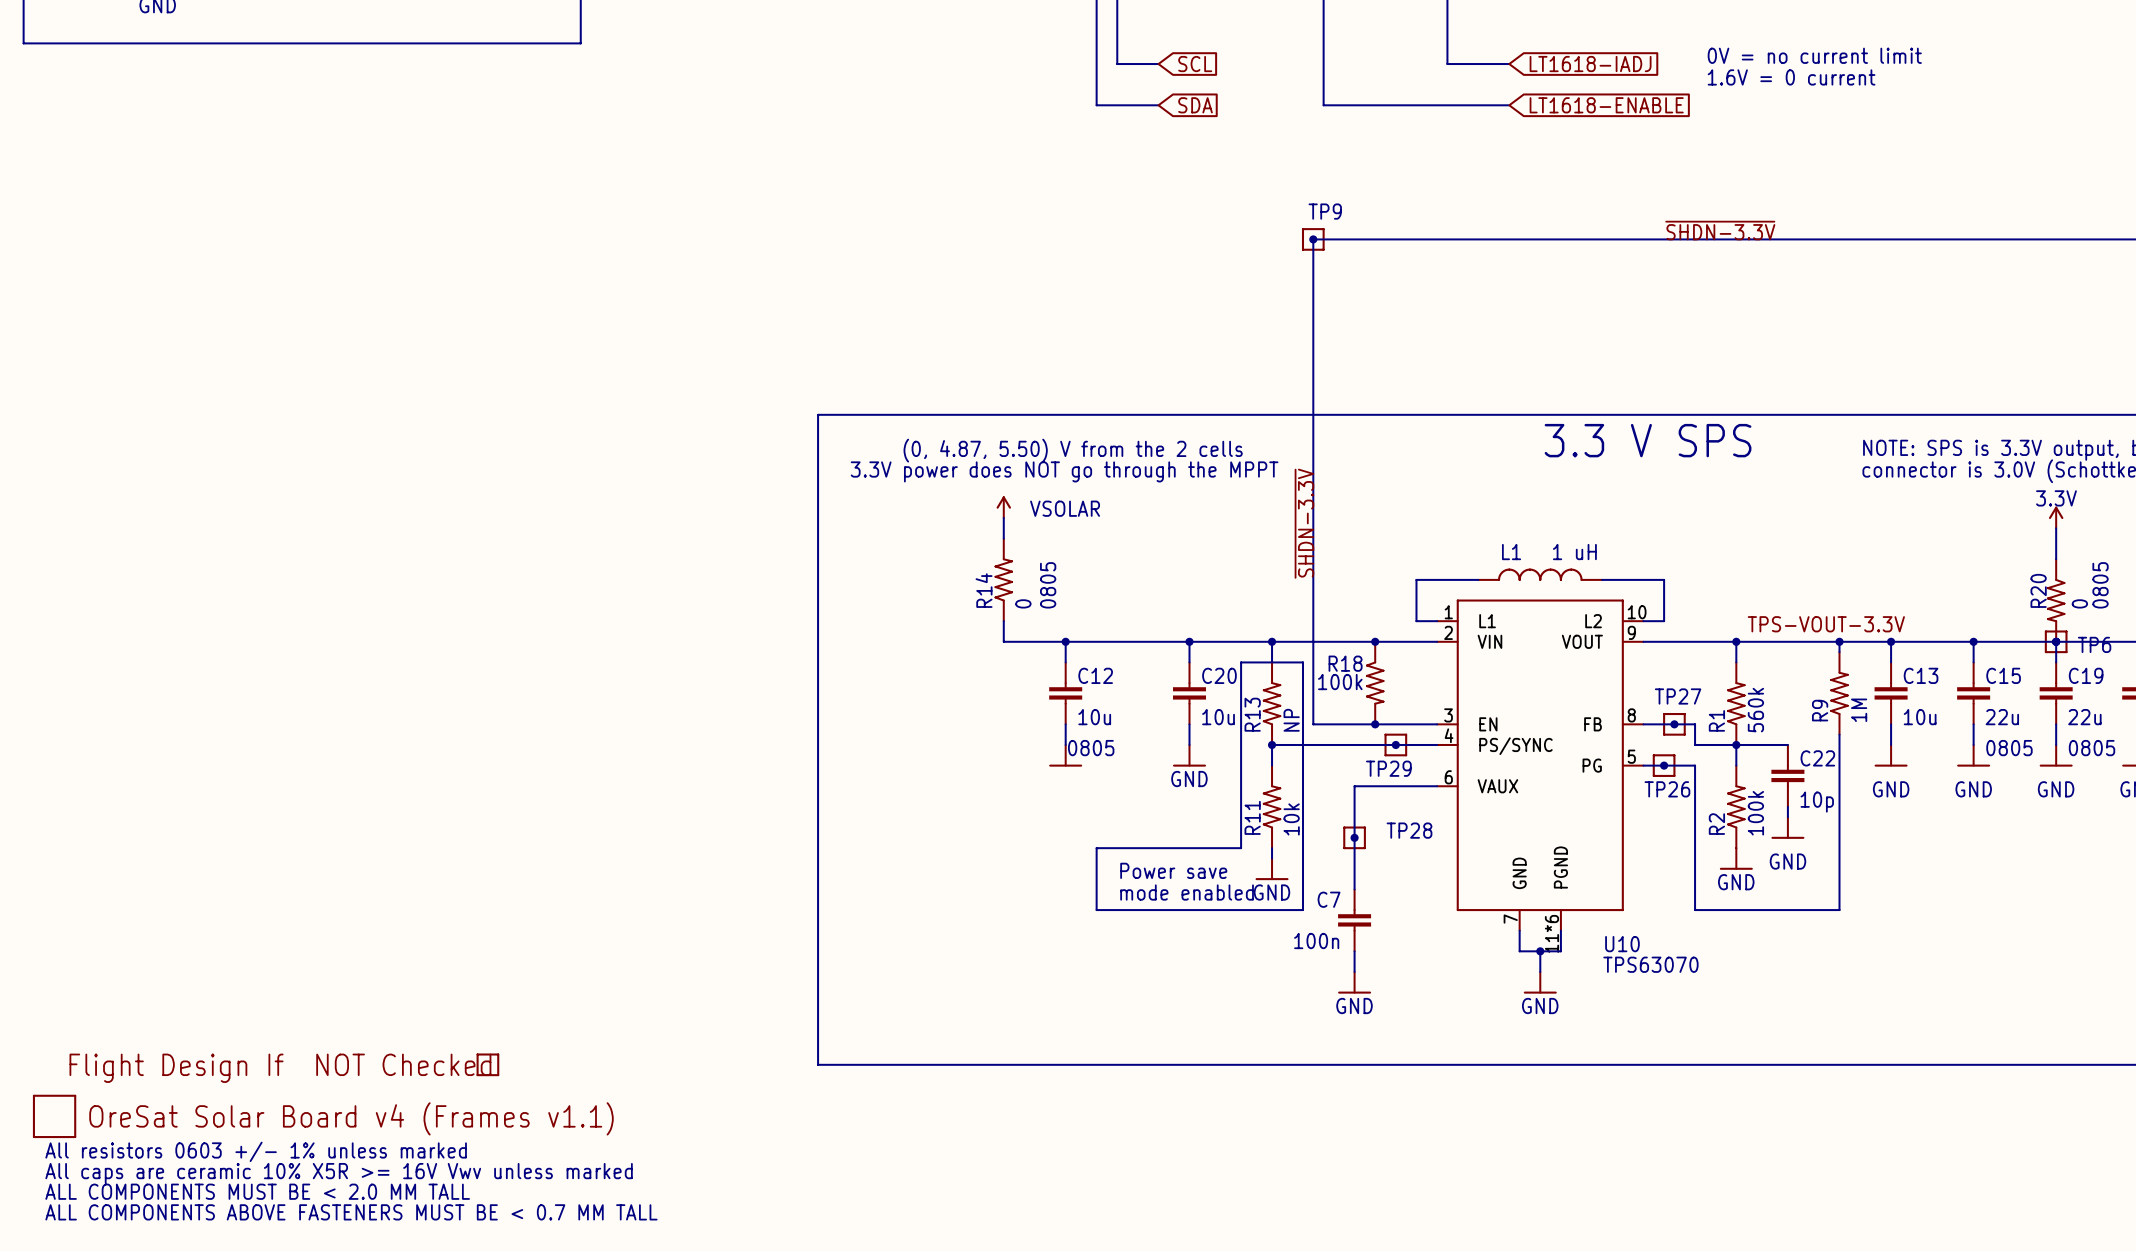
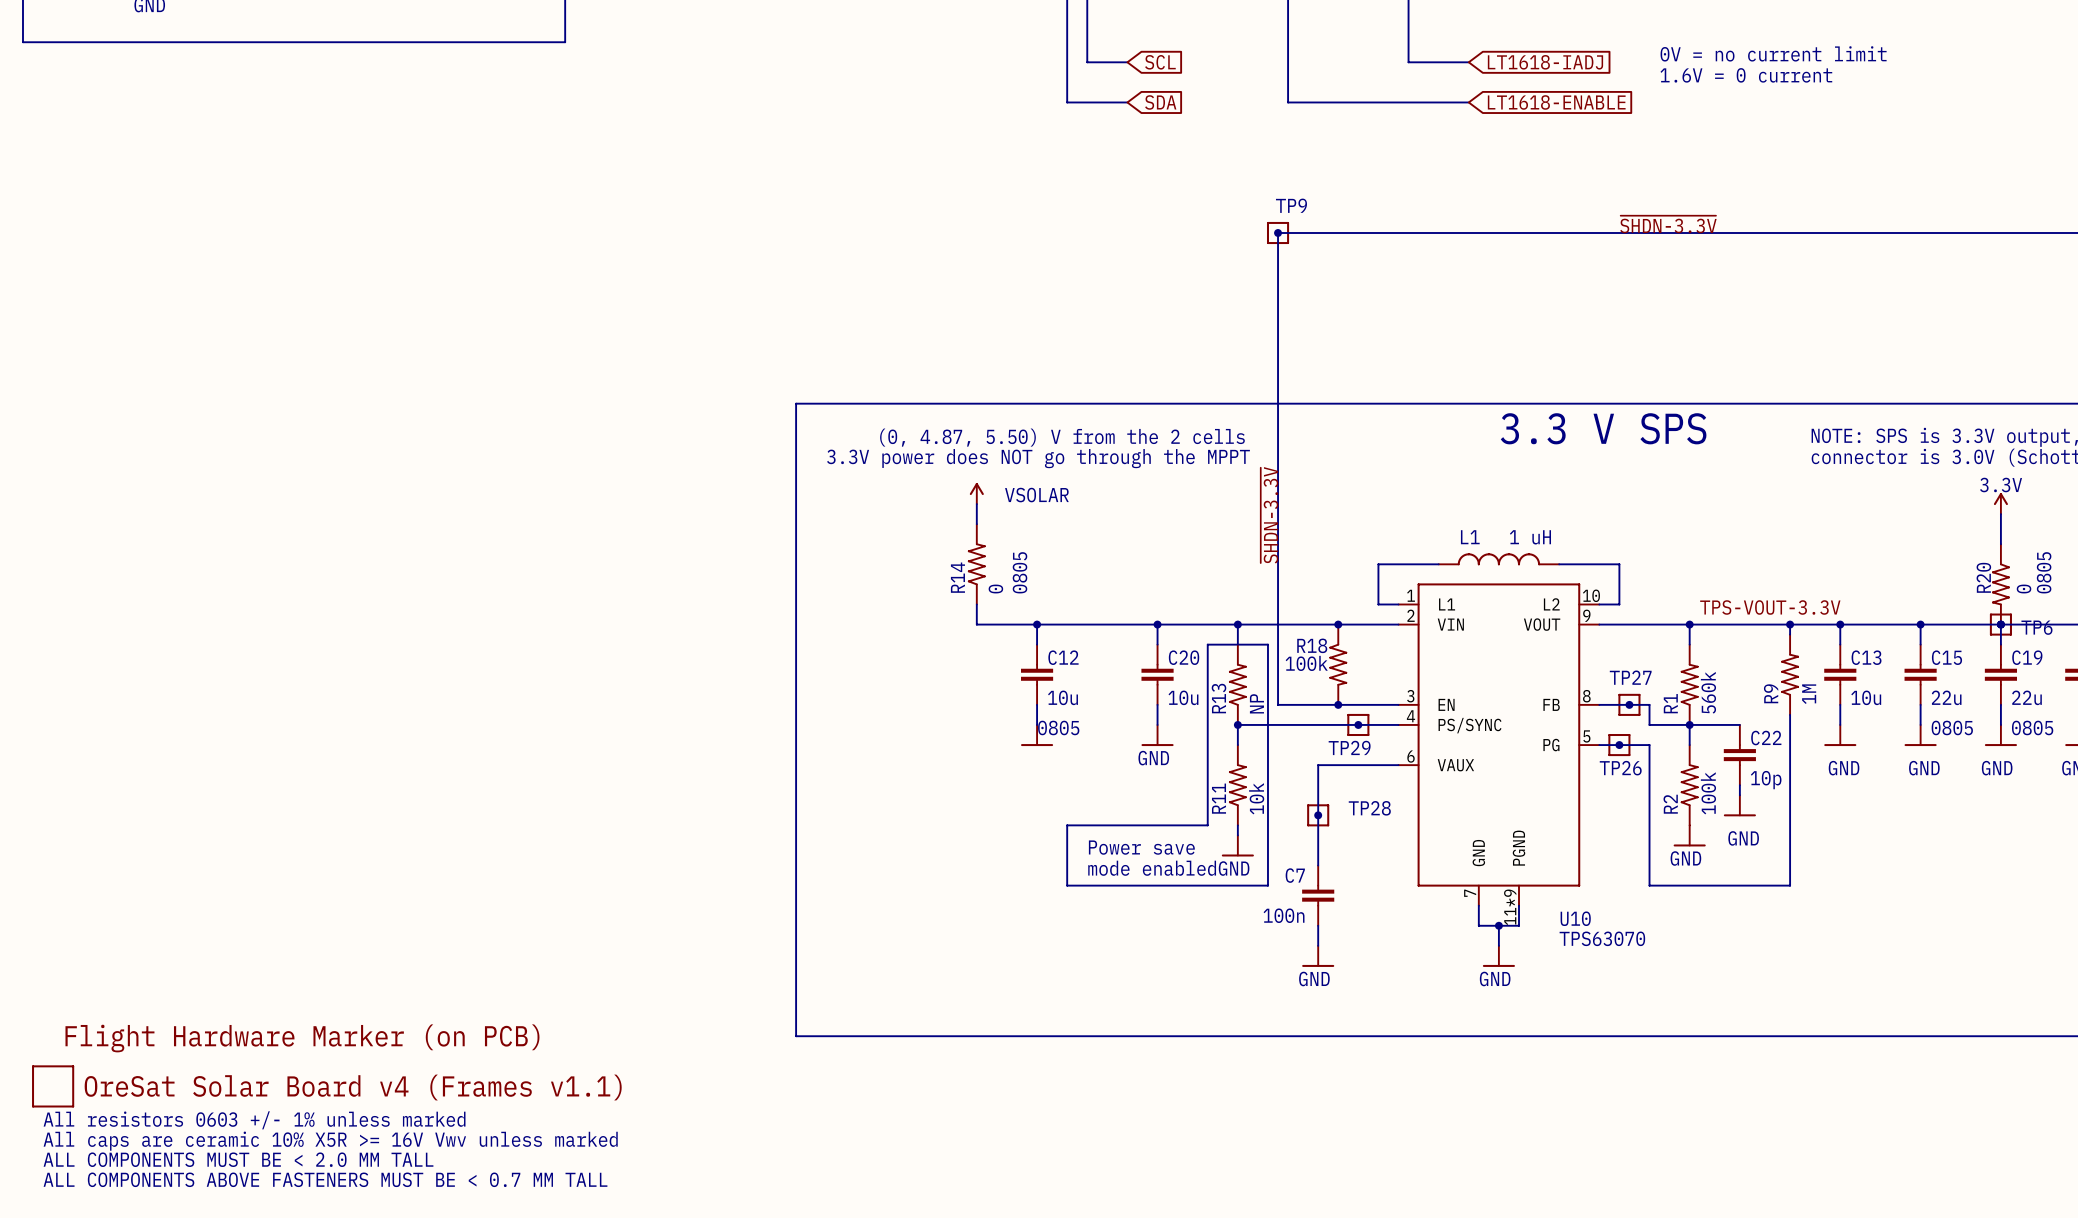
U10 pin number: 11*6 (1551, 933) -> 11*9 (1510, 907)
part: (487, 1064) -> none
part: none -> (302, 1038)

